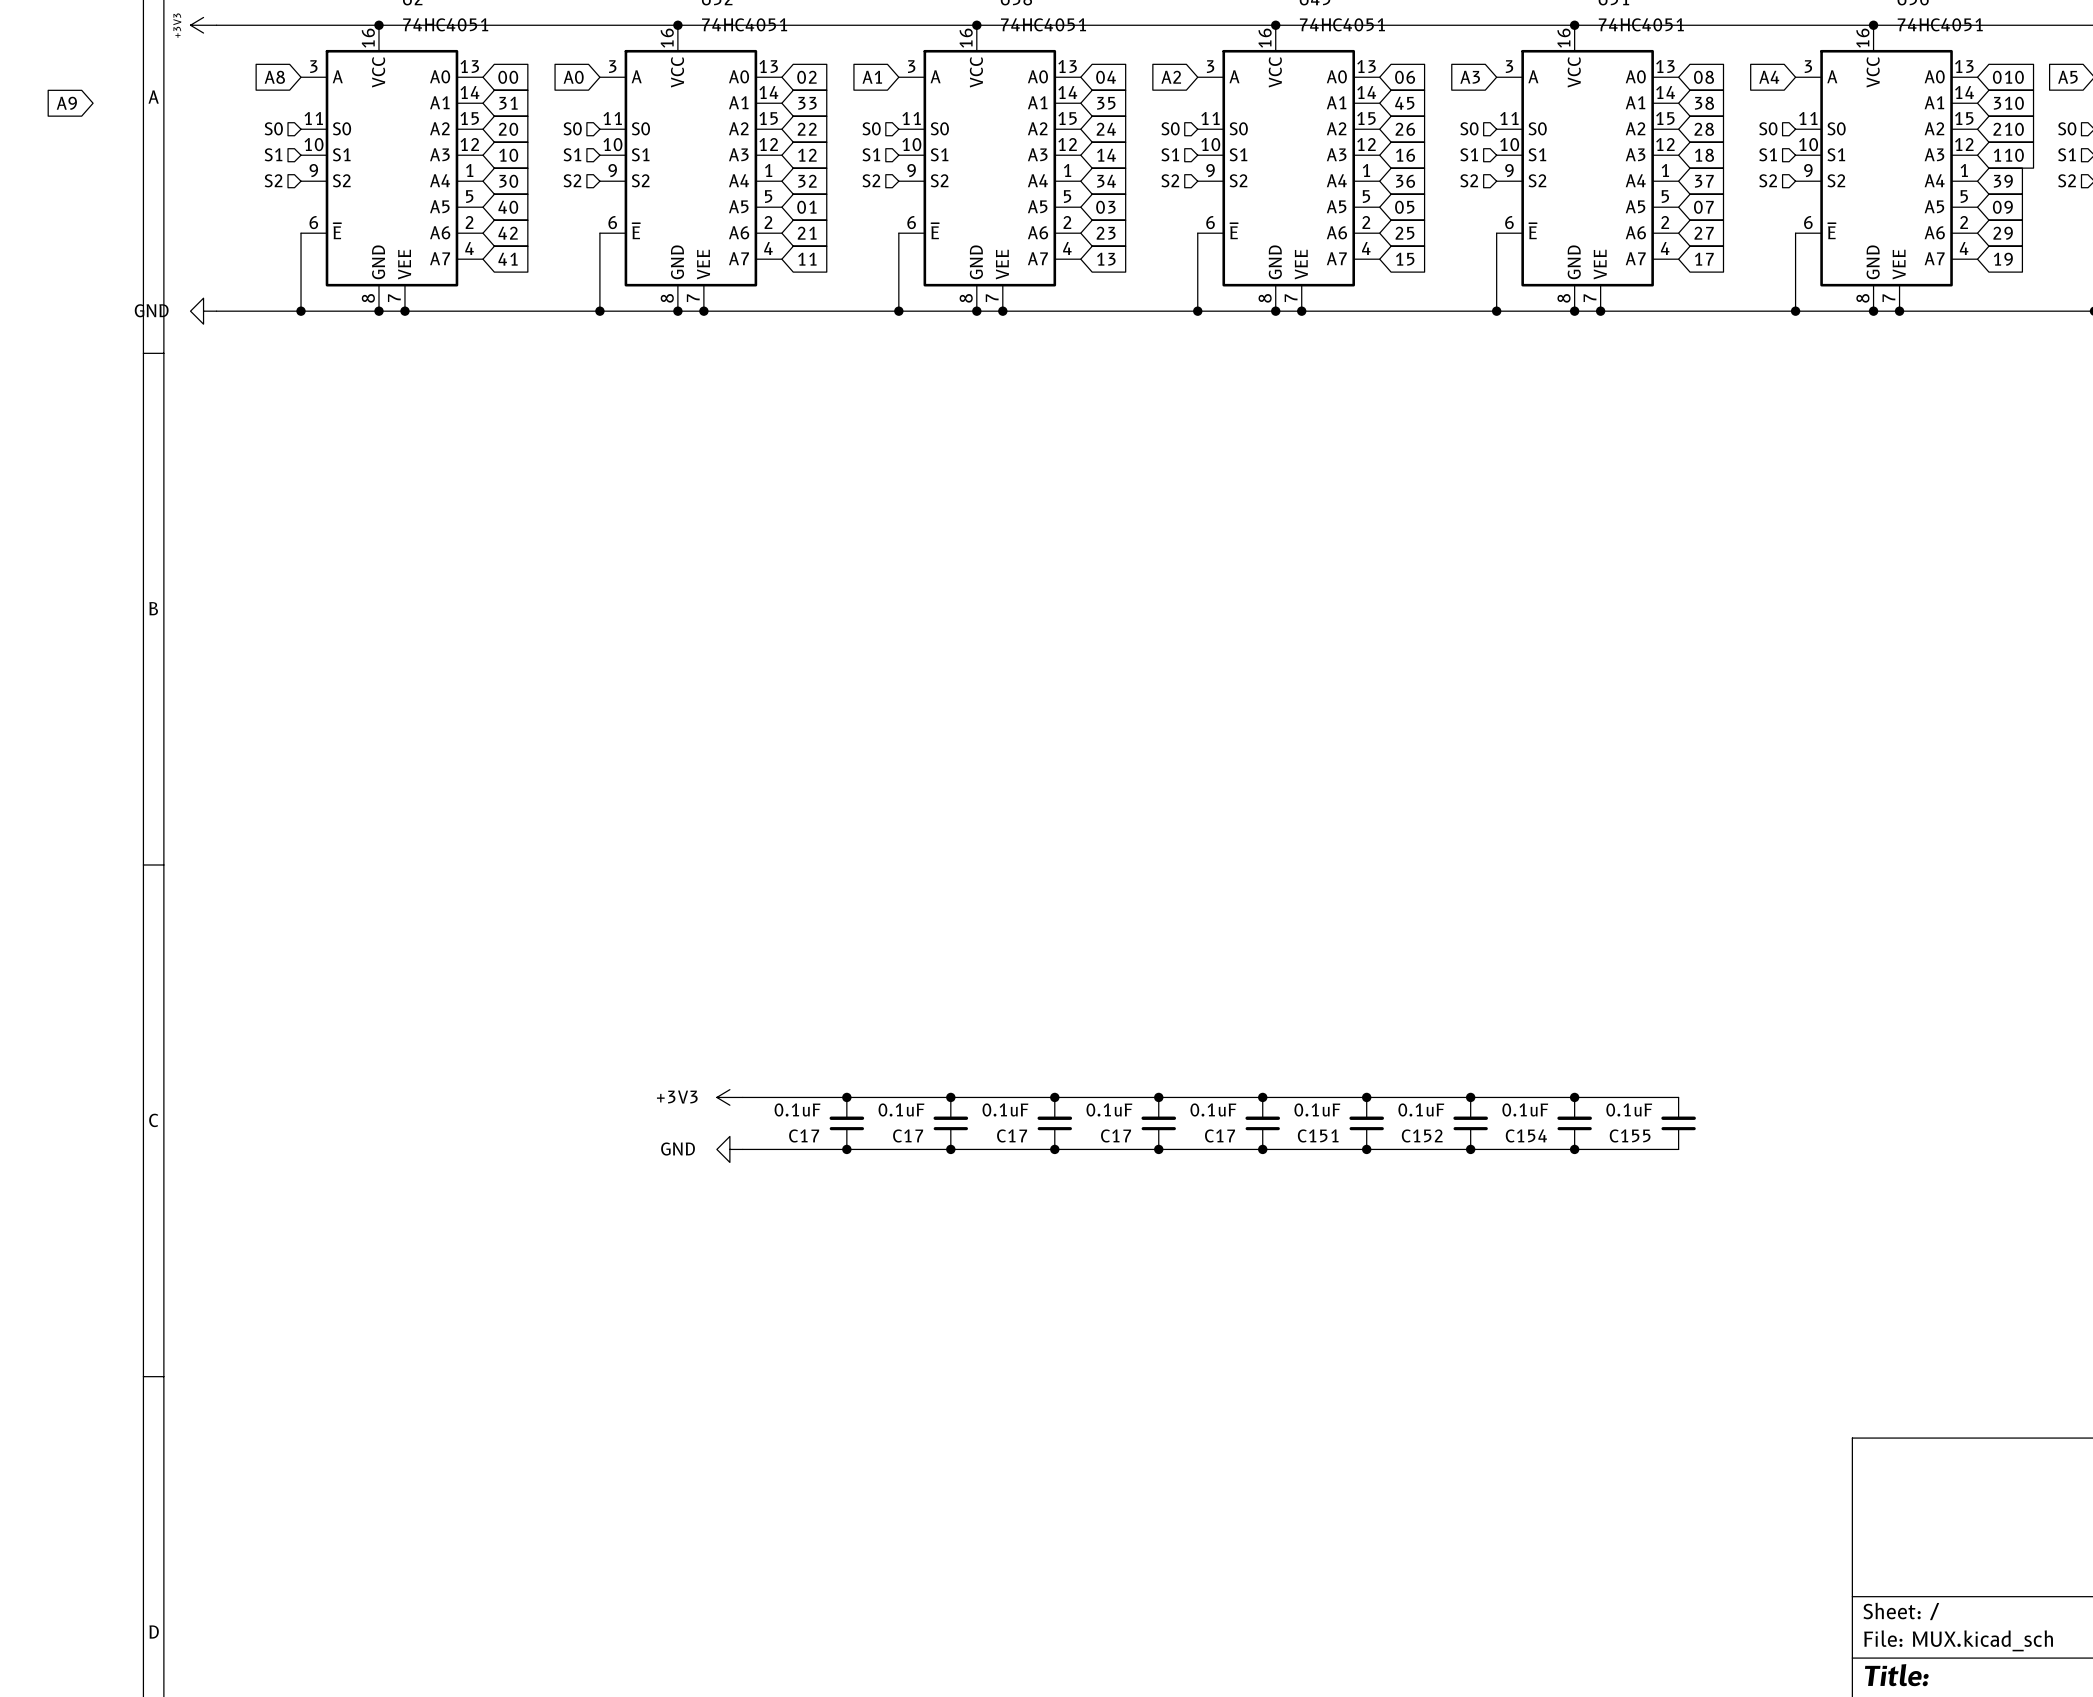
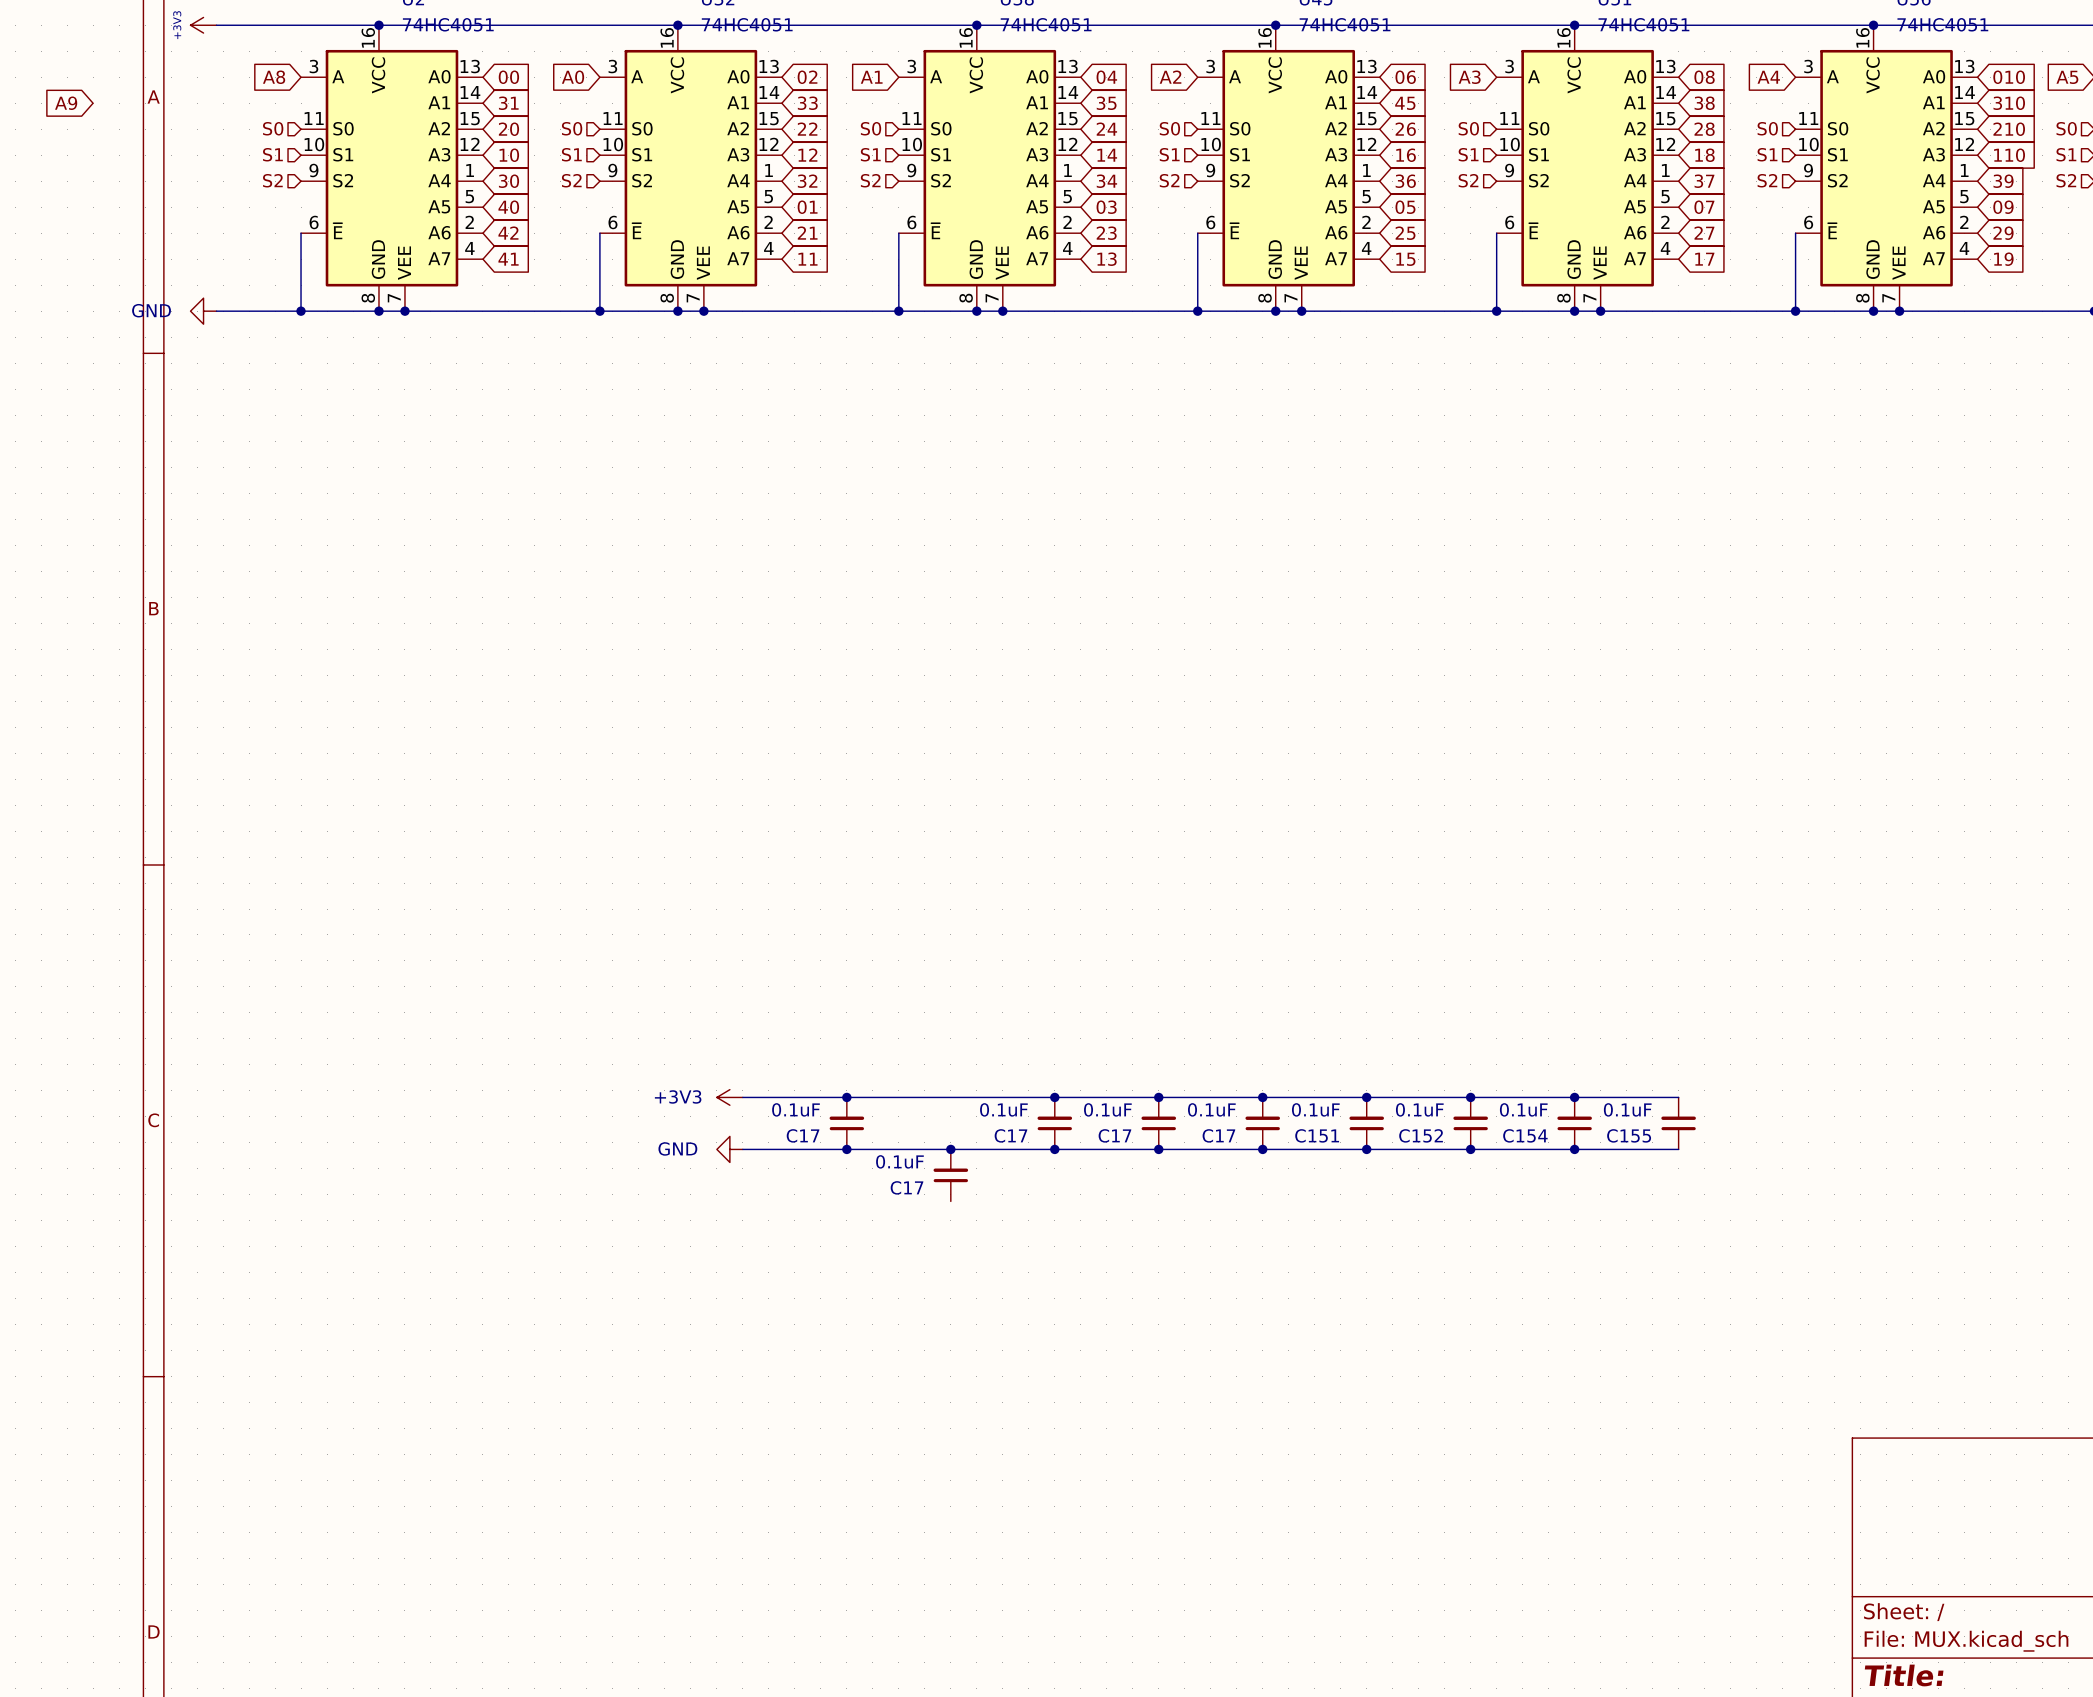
junction: (950, 1097) -> none
C17 position: (950, 1123) -> (950, 1175)

